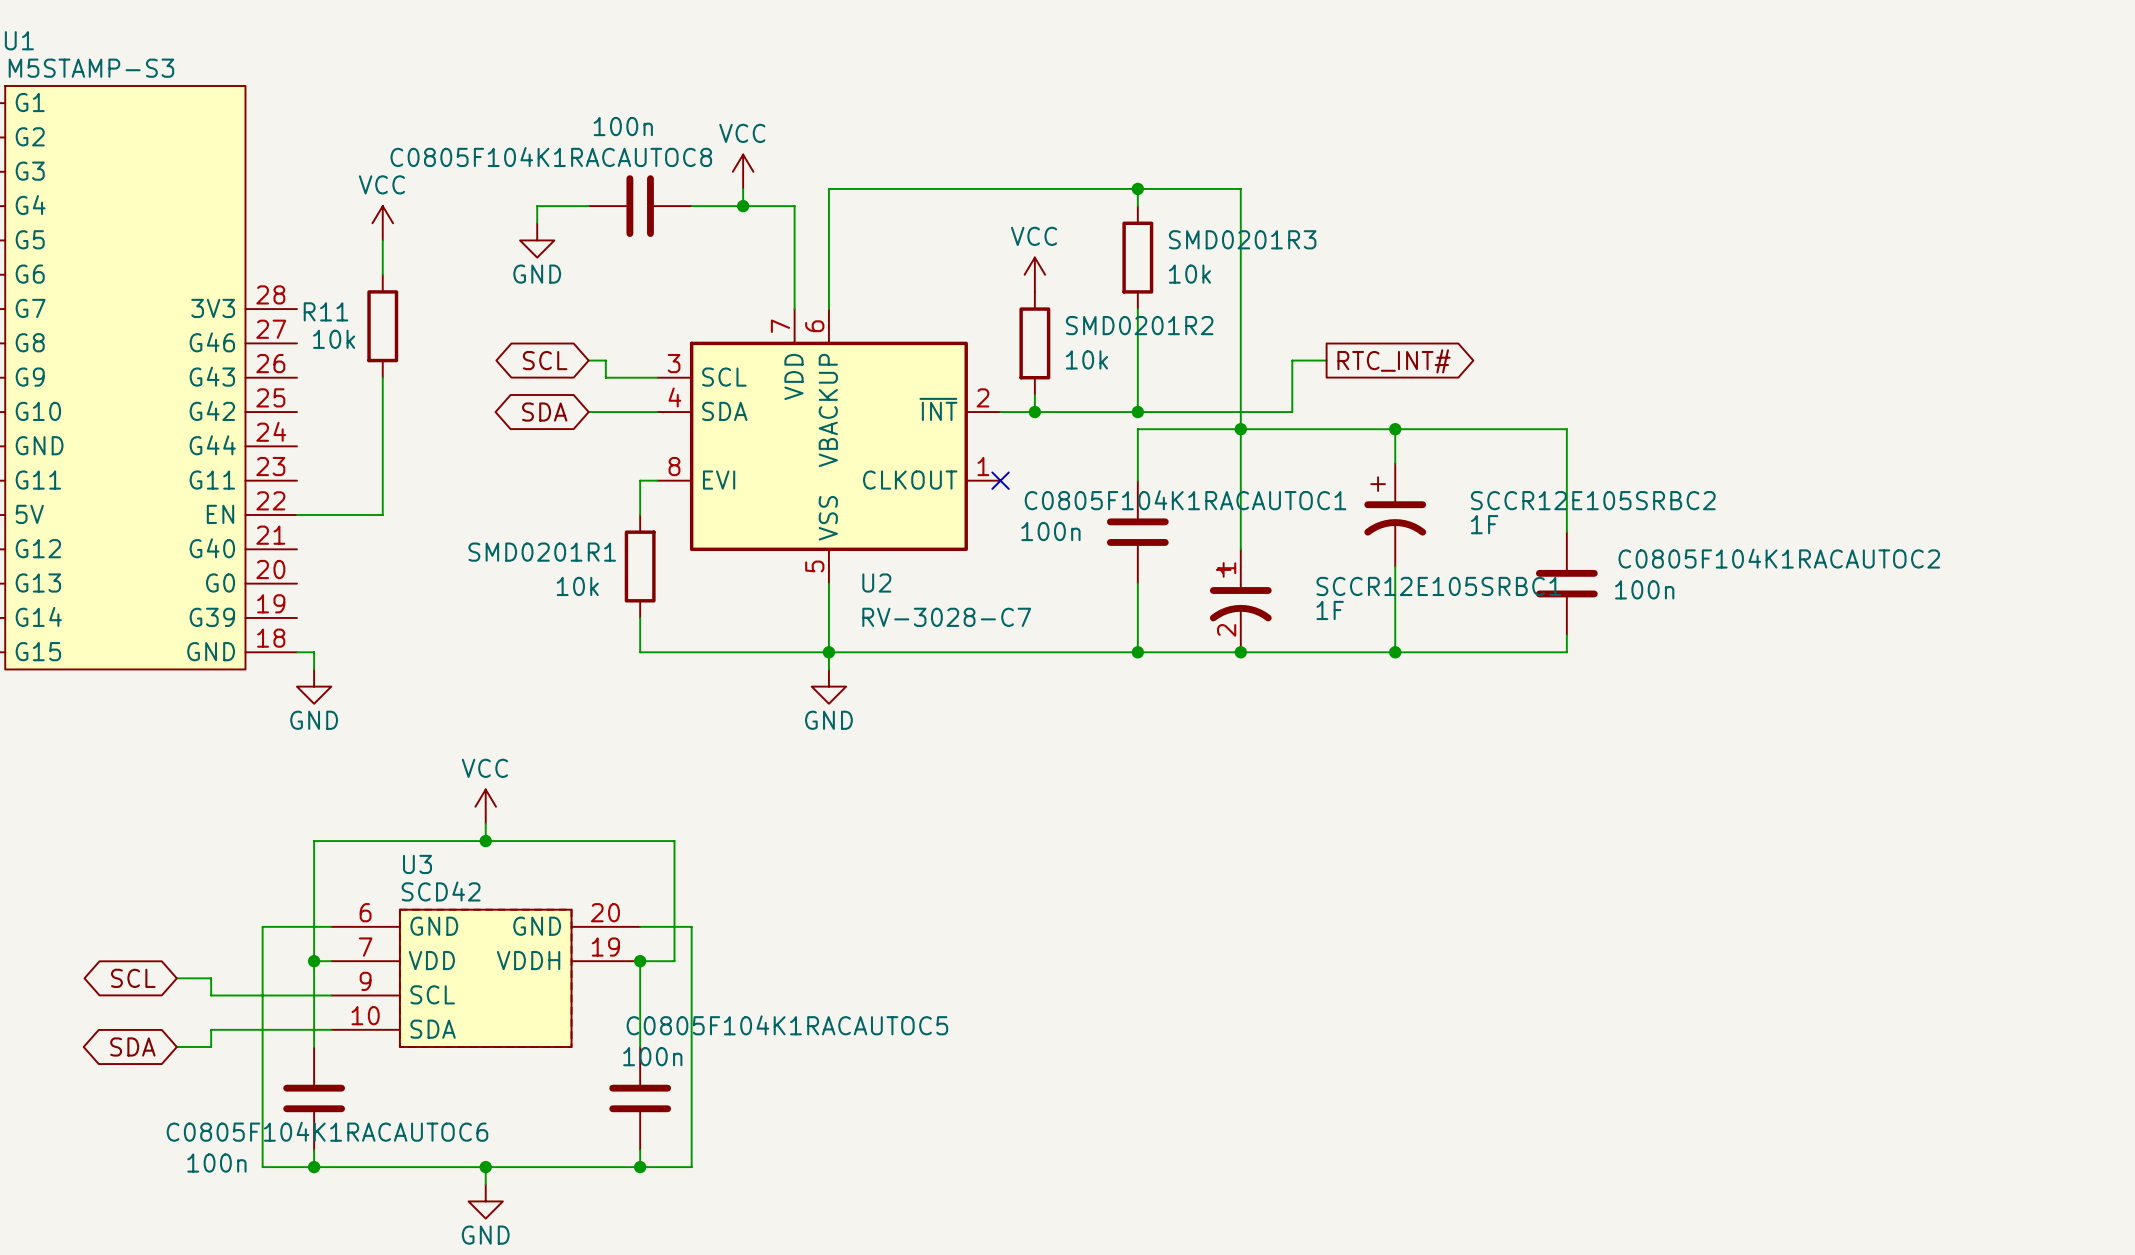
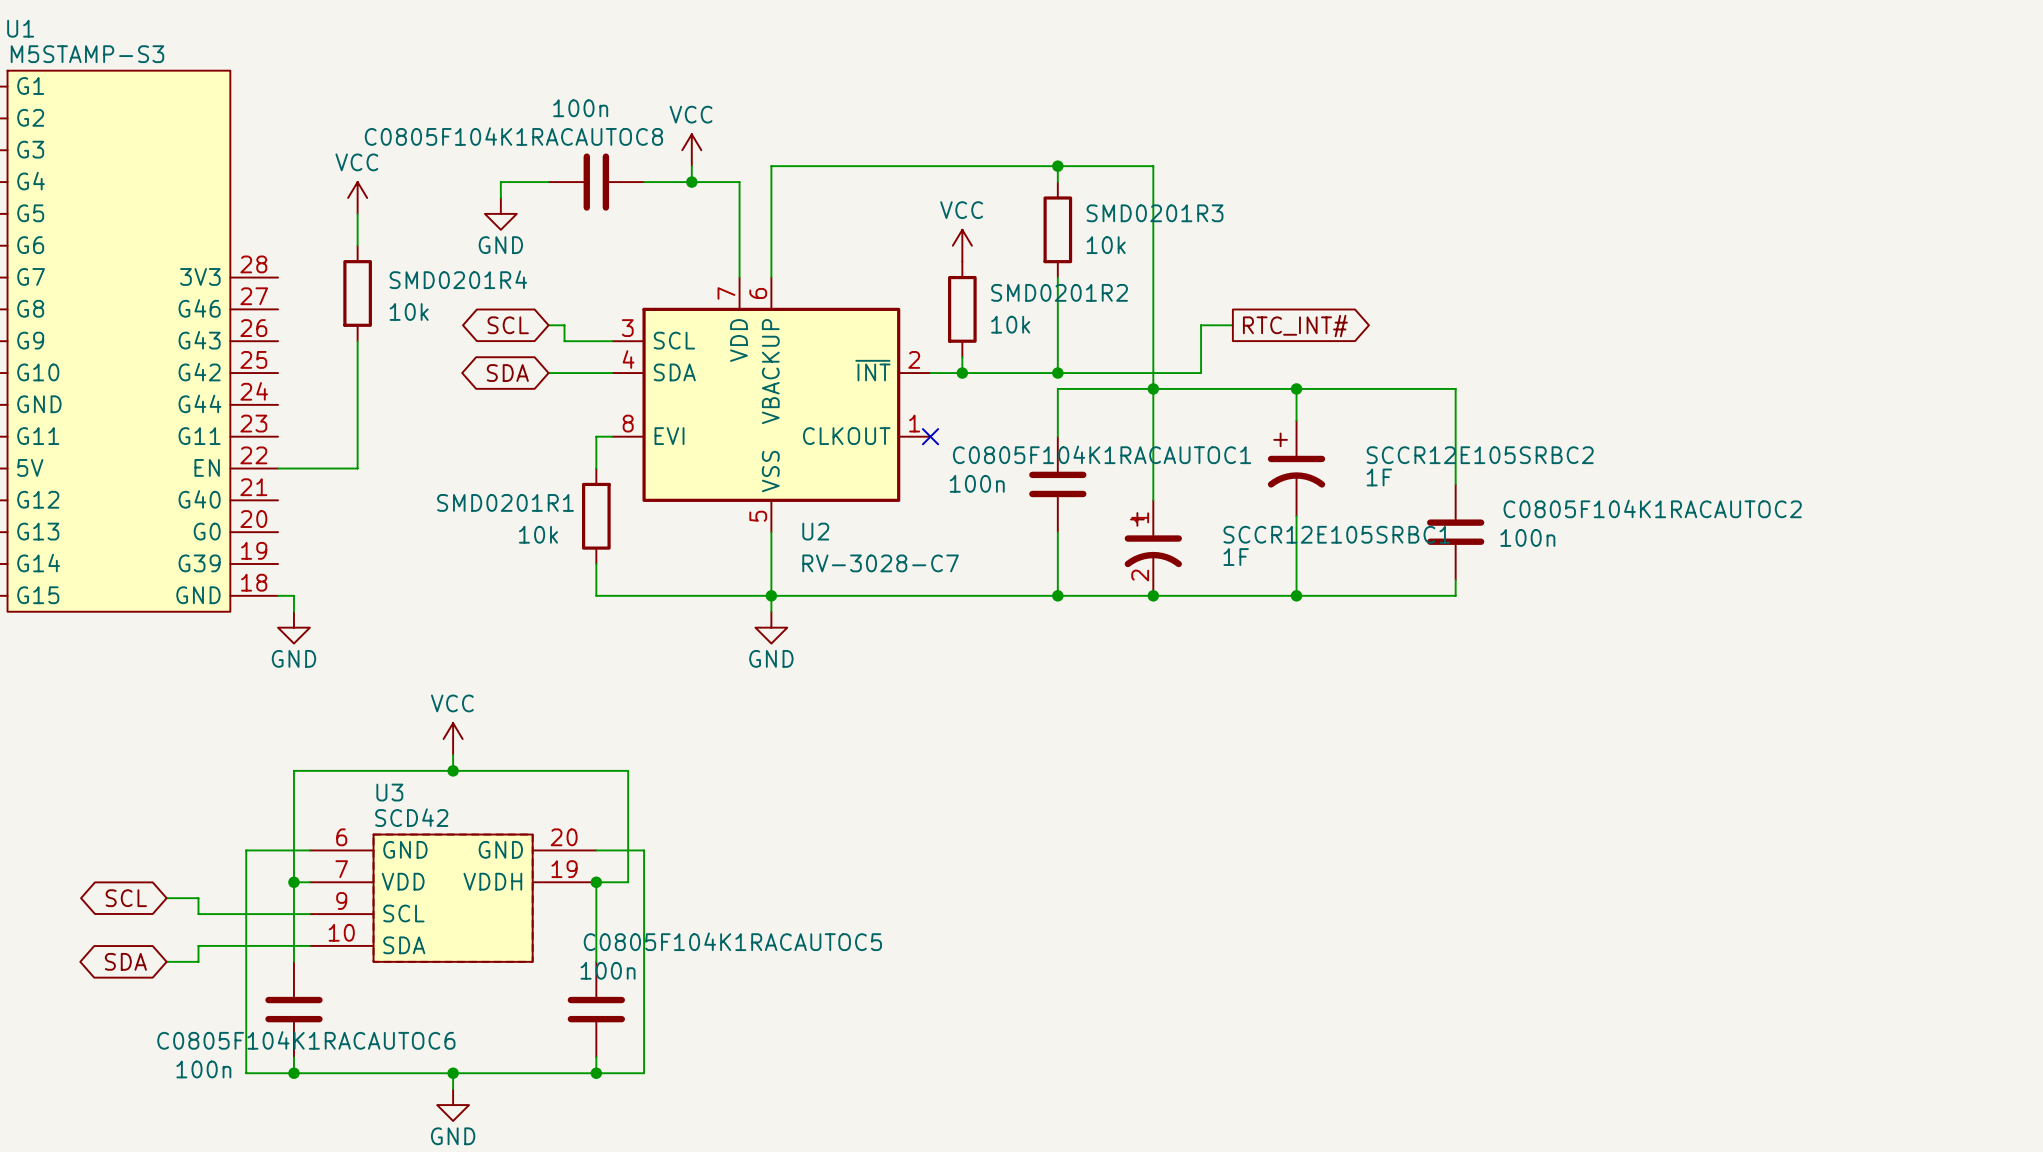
R11 name: R11 (326, 311) -> SMD0201R4 (458, 279)
R11 value position: 10k (334, 339) -> 10k (409, 311)

